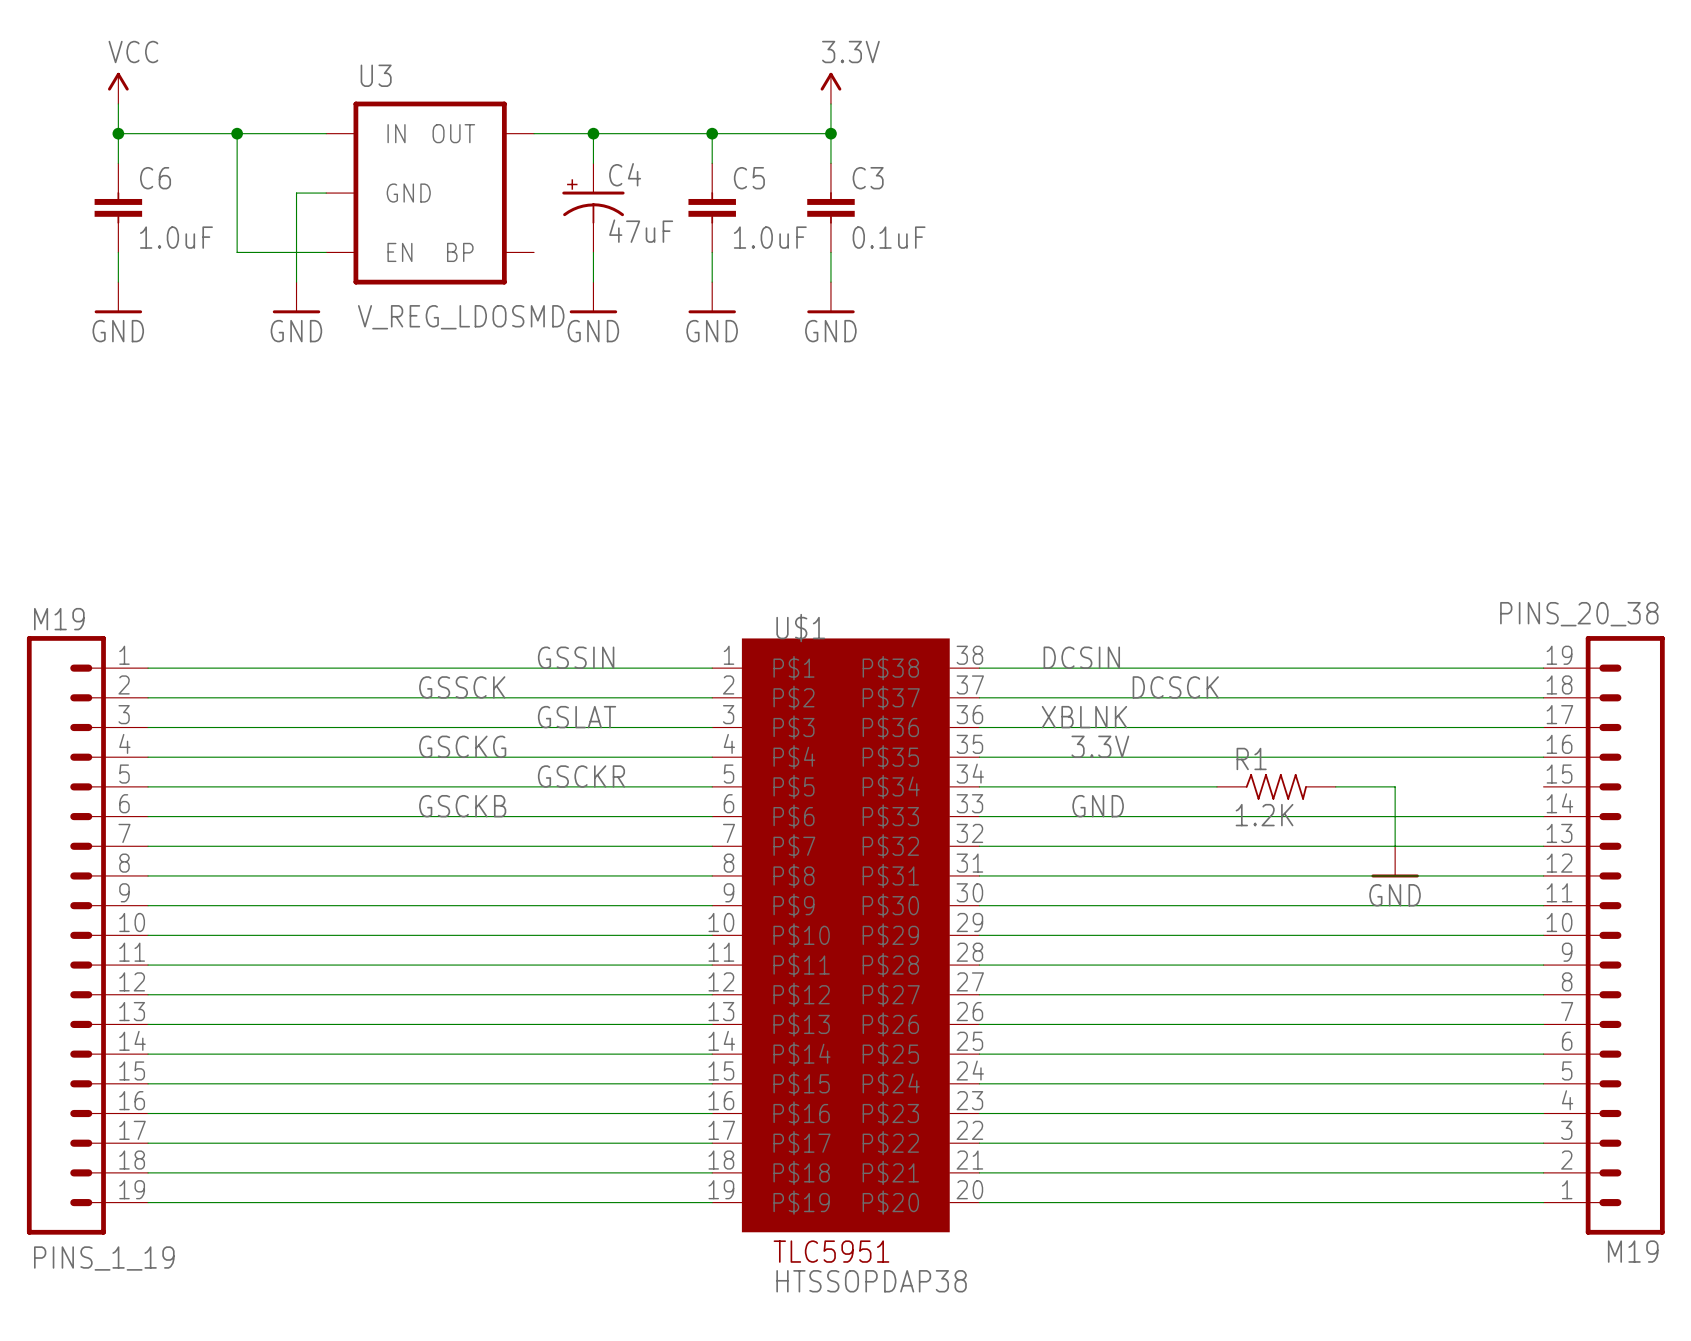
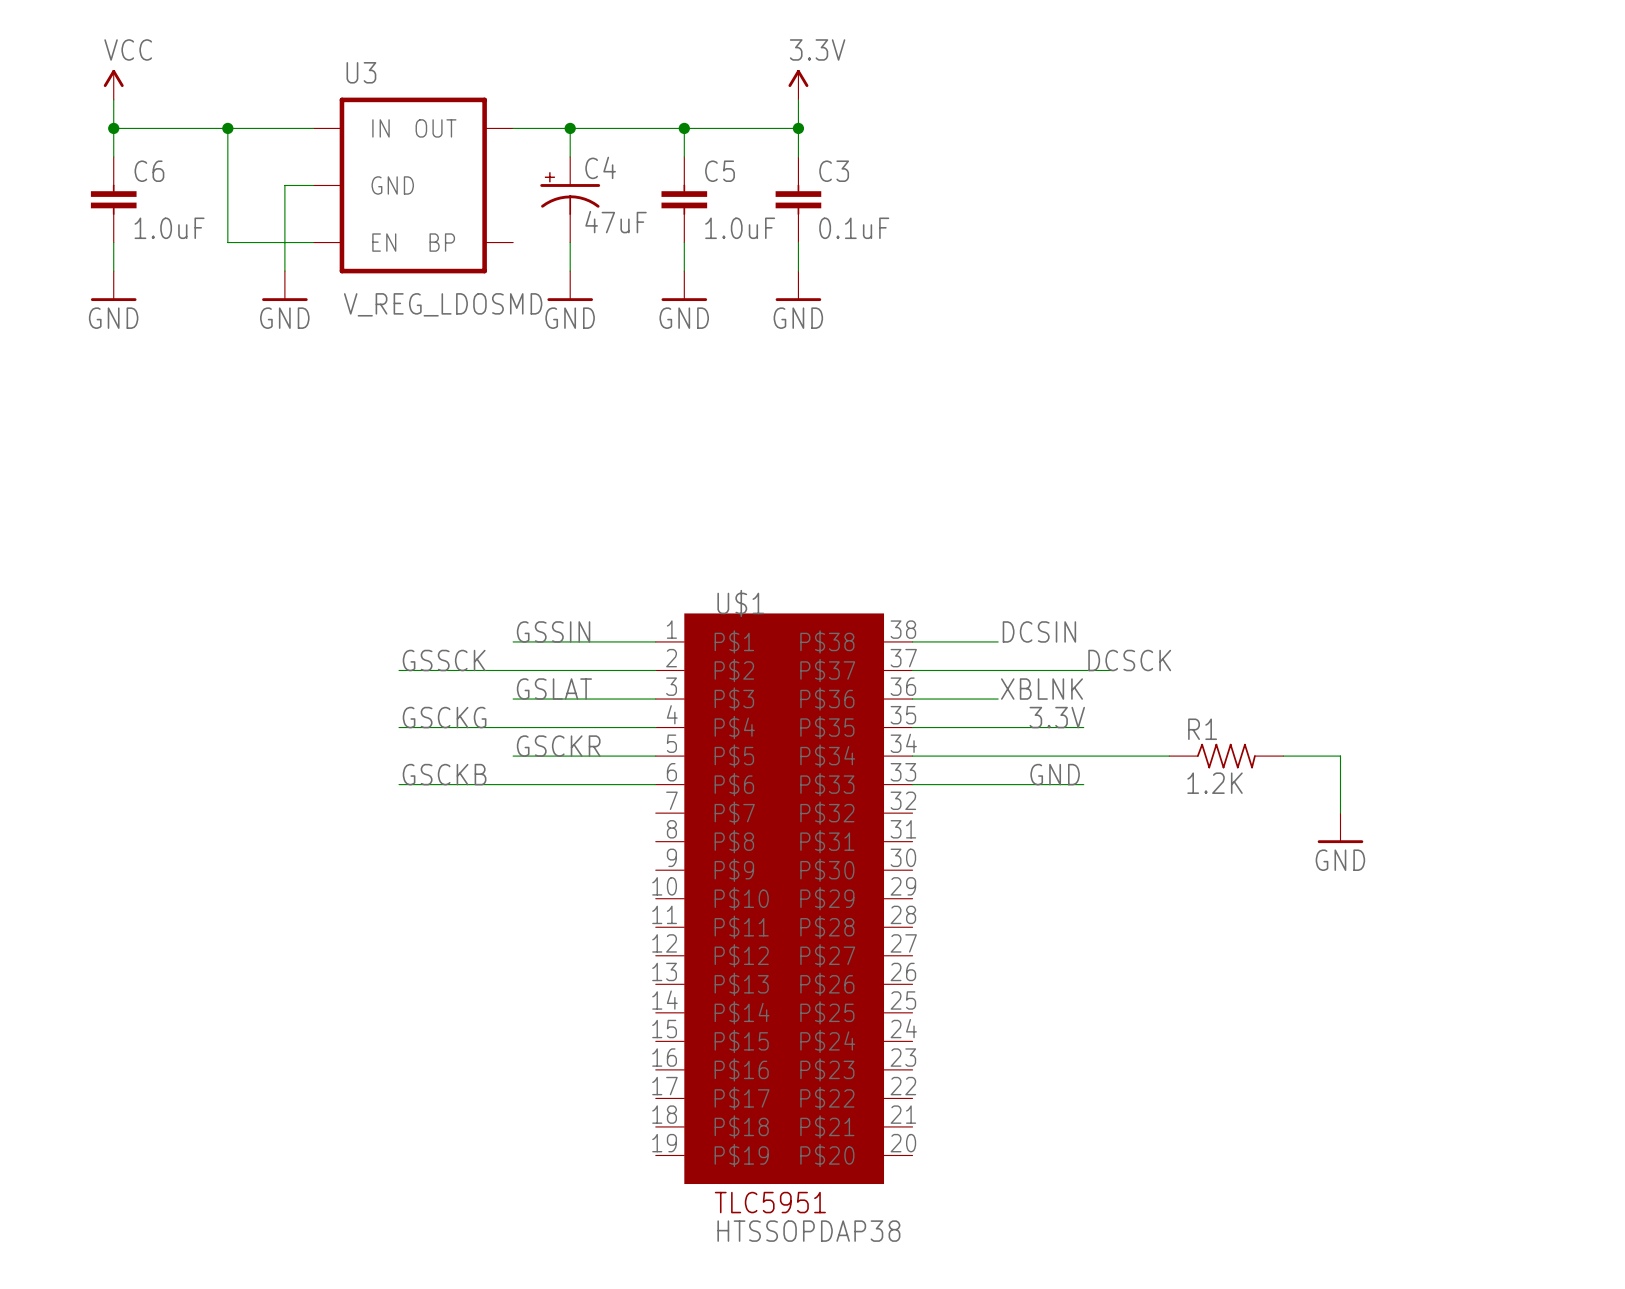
wire: (148, 668) (534, 668) -> none
wire: (1038, 668) (1543, 668) -> none
wire: (148, 697) (415, 697) -> none
wire: (1157, 697) (1543, 697) -> none
wire: (148, 727) (534, 727) -> none
wire: (1038, 727) (1543, 727) -> none
wire: (148, 757) (415, 757) -> none
wire: (1127, 757) (1543, 757) -> none
wire: (148, 786) (534, 786) -> none
wire: (148, 816) (415, 816) -> none
wire: (1127, 816) (1543, 816) -> none
wire: (148, 846) (712, 846) -> none
wire: (979, 846) (1543, 846) -> none
wire: (148, 875) (712, 875) -> none
wire: (979, 875) (1543, 875) -> none
wire: (148, 905) (712, 905) -> none
wire: (979, 905) (1543, 905) -> none
PINS_1_19: M19 (87, 935) -> none
wire: (148, 935) (712, 935) -> none
U$1 position: (845, 935) -> (784, 898)
wire: (979, 935) (1543, 935) -> none
PINS_20_38: M19 (1604, 935) -> none
wire: (148, 965) (712, 965) -> none
wire: (979, 965) (1543, 965) -> none
wire: (148, 994) (712, 994) -> none
wire: (979, 994) (1543, 994) -> none
wire: (148, 1024) (712, 1024) -> none
wire: (979, 1024) (1543, 1024) -> none
wire: (148, 1054) (712, 1054) -> none
wire: (979, 1054) (1543, 1054) -> none
wire: (148, 1083) (712, 1083) -> none
wire: (979, 1083) (1543, 1083) -> none
wire: (148, 1113) (712, 1113) -> none
wire: (979, 1113) (1543, 1113) -> none
wire: (148, 1143) (712, 1143) -> none
wire: (979, 1143) (1543, 1143) -> none
wire: (148, 1172) (712, 1172) -> none
wire: (979, 1172) (1543, 1172) -> none
wire: (148, 1202) (712, 1202) -> none
wire: (979, 1202) (1543, 1202) -> none

